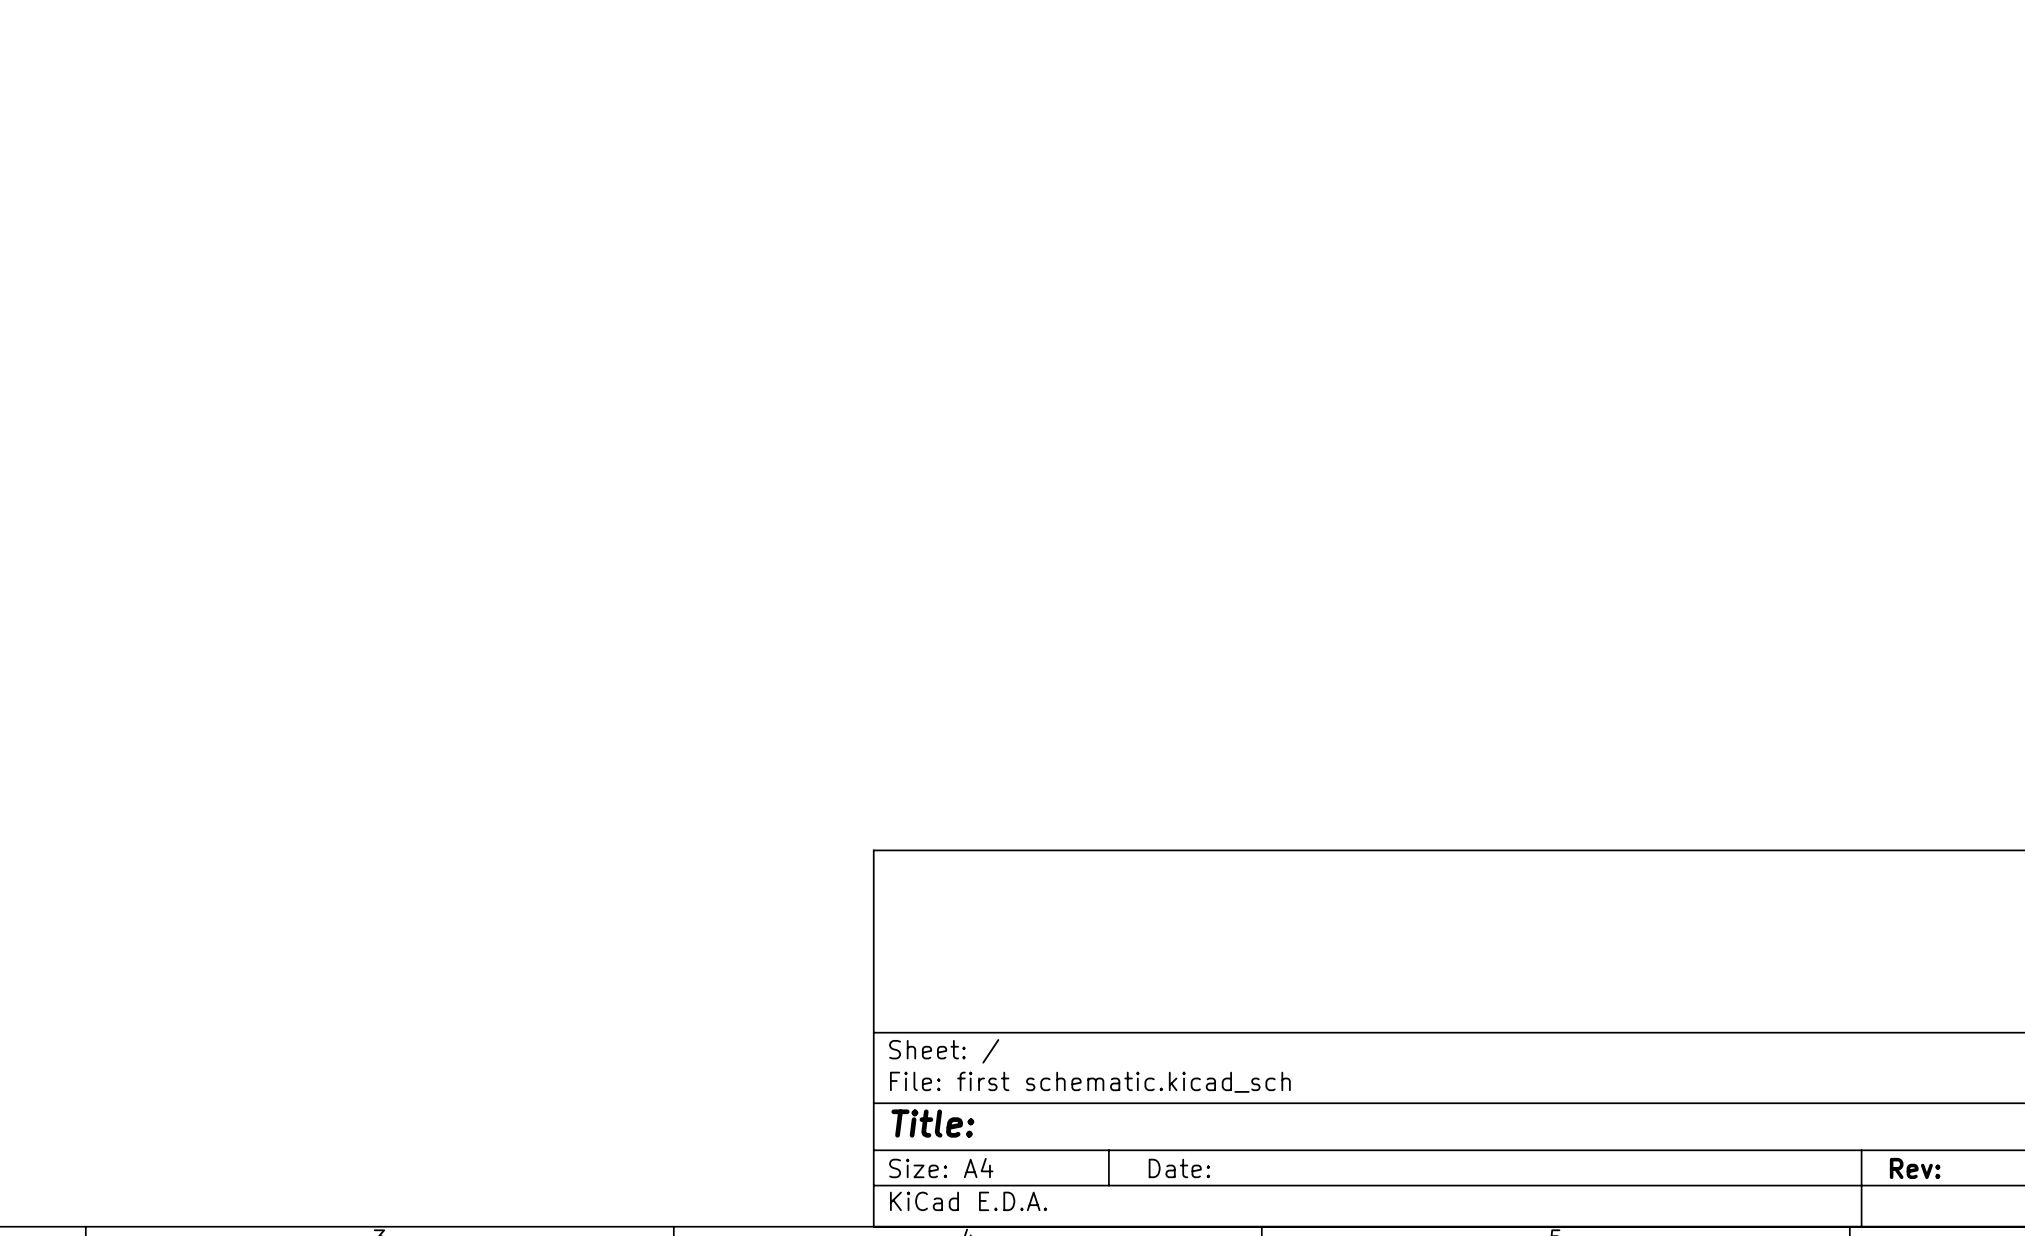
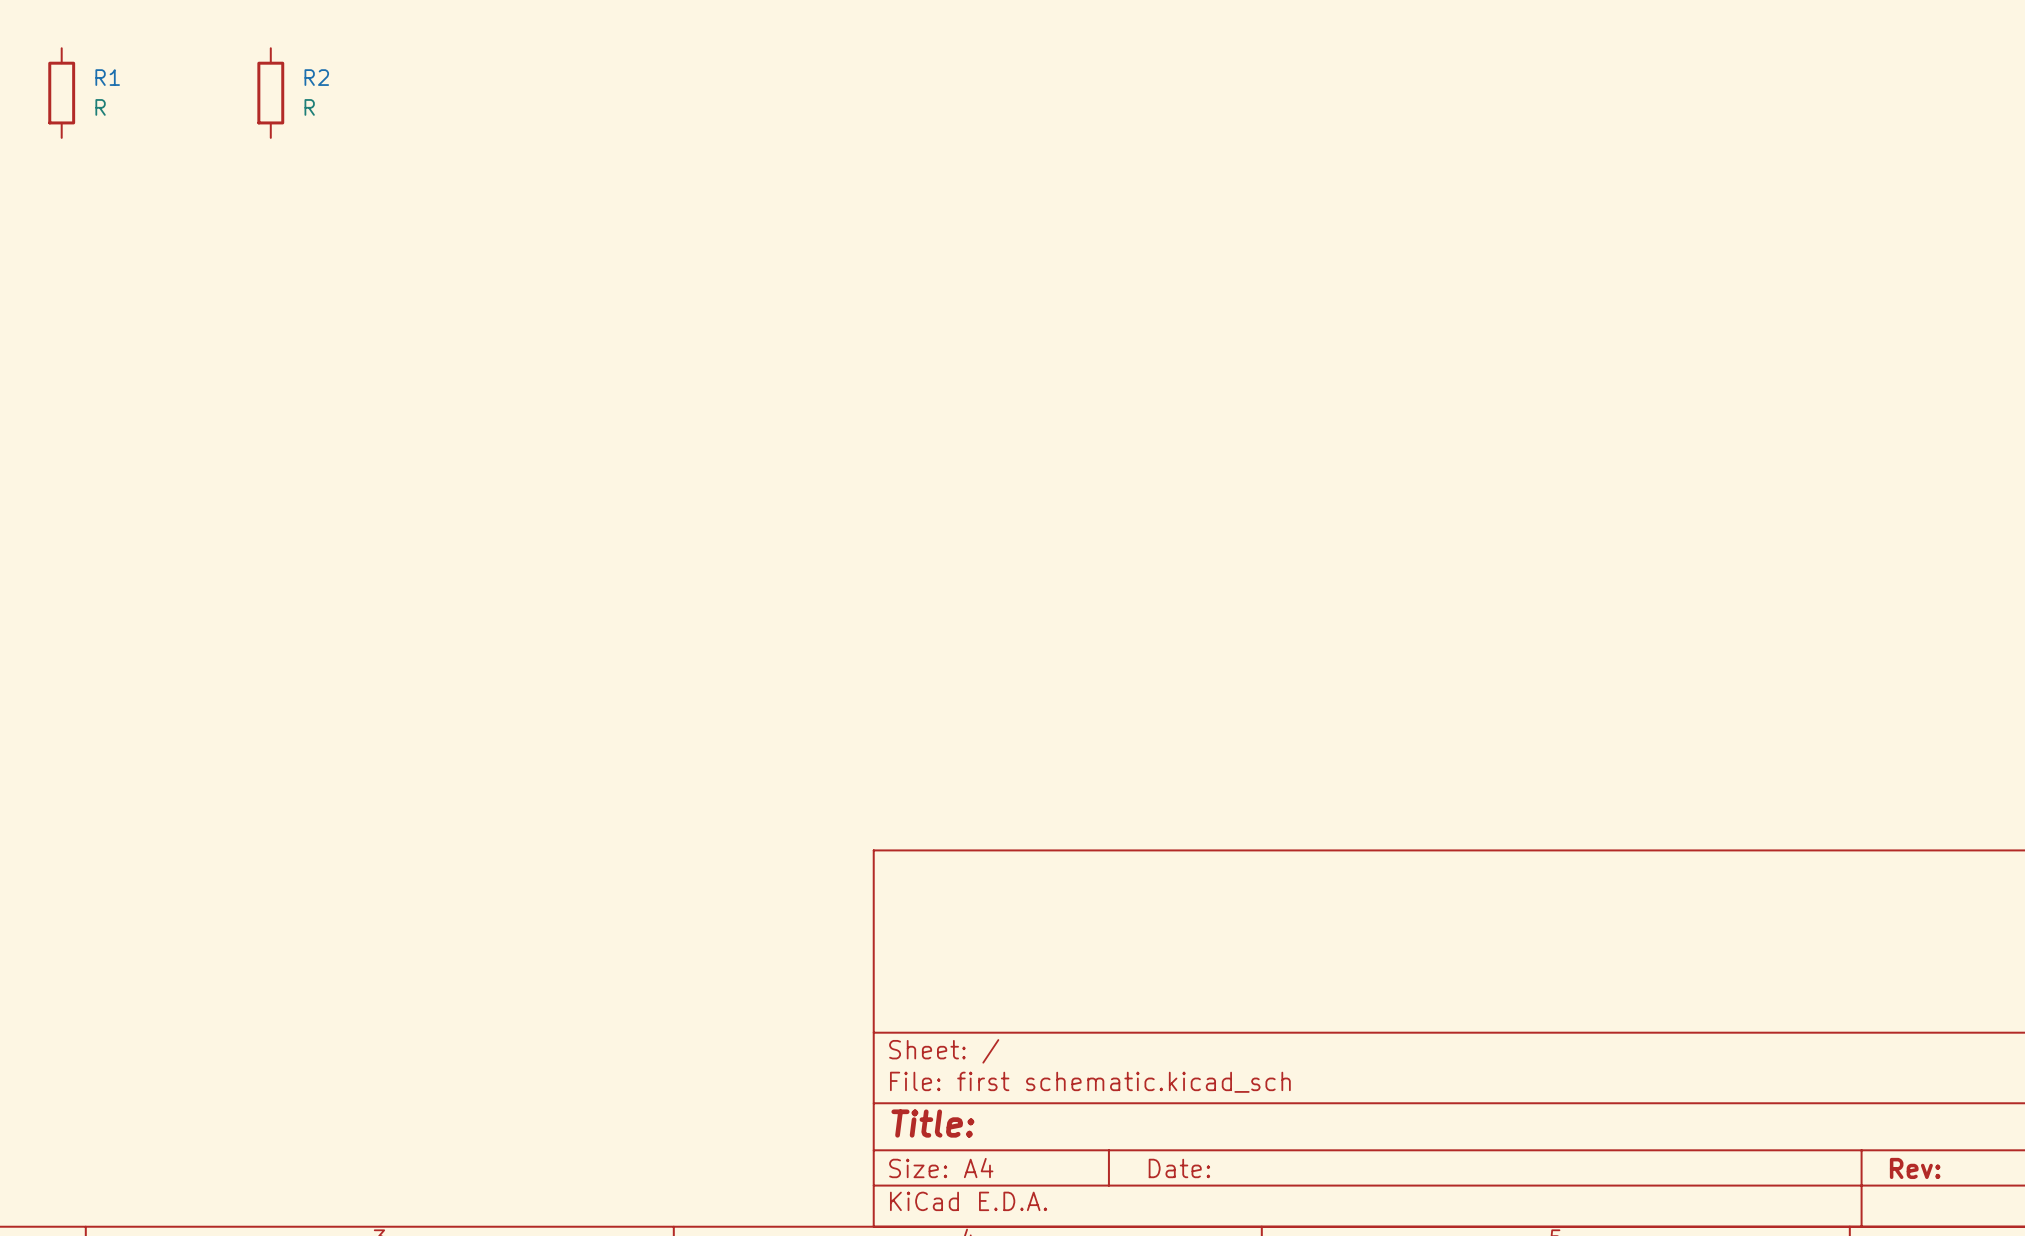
R1: none -> R (61, 93)
R2: none -> R (270, 93)

